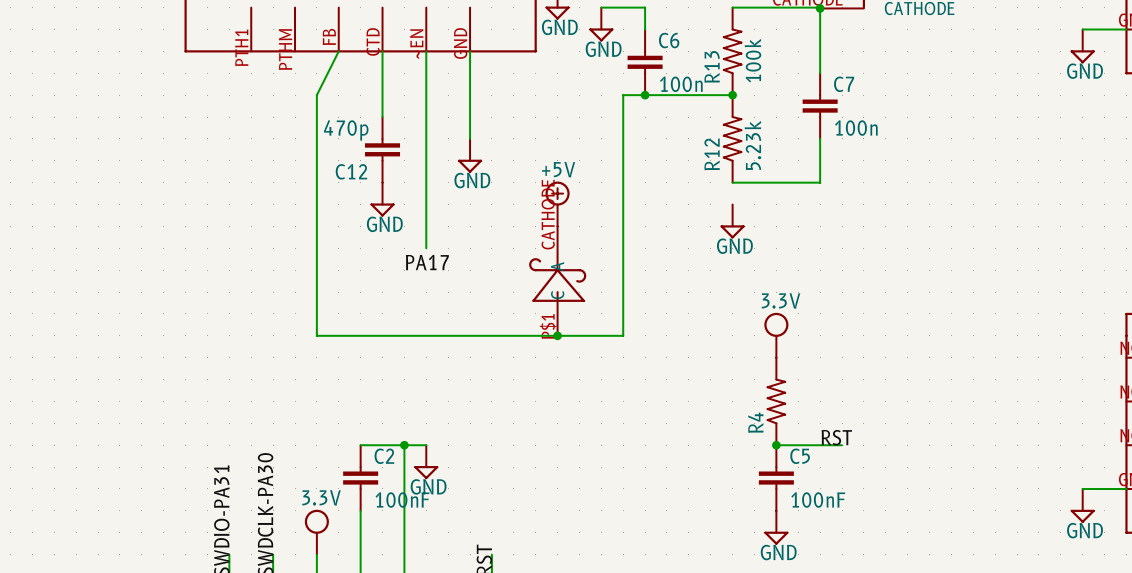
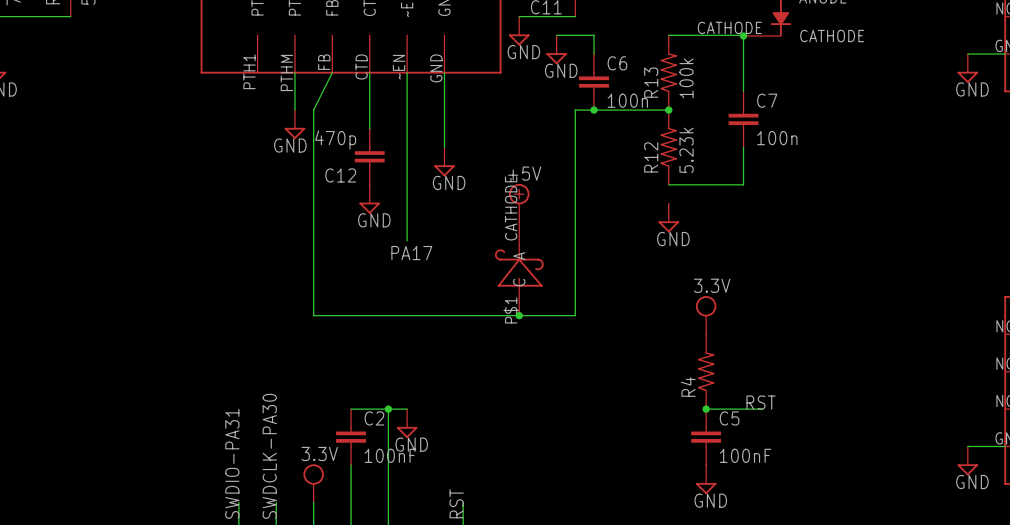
wire: none -> (294, 72) (294, 110)
power symbol: none -> GND (294, 124)

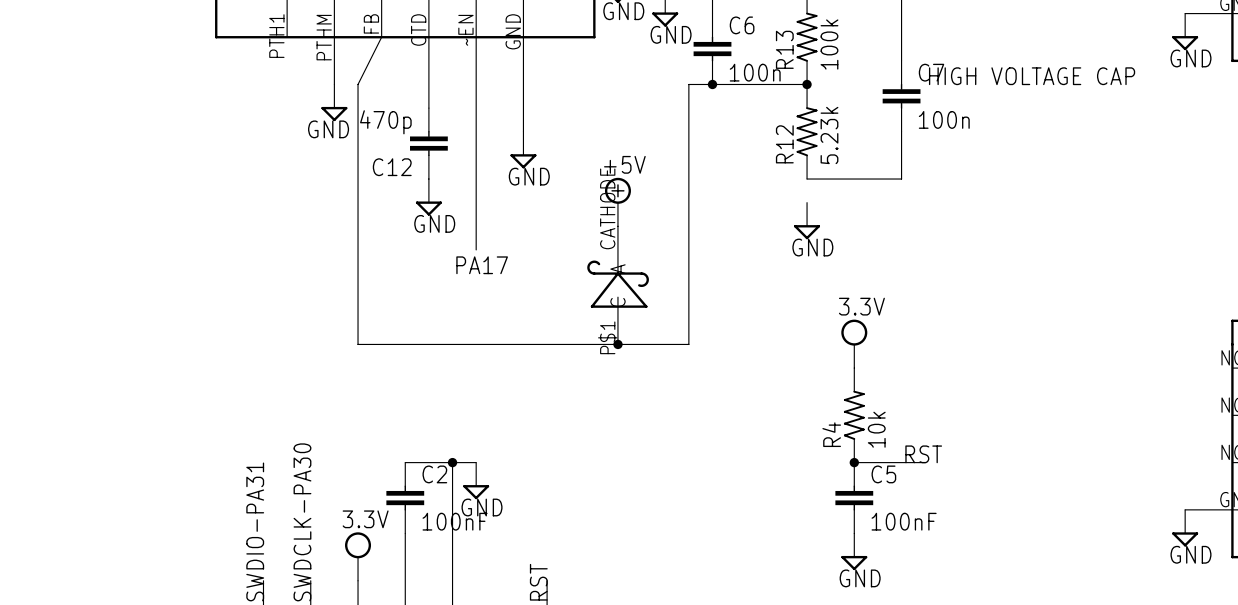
text: none -> HIGH VOLTAGE CAP (1032, 76)
R4 value: none -> 10k (876, 429)

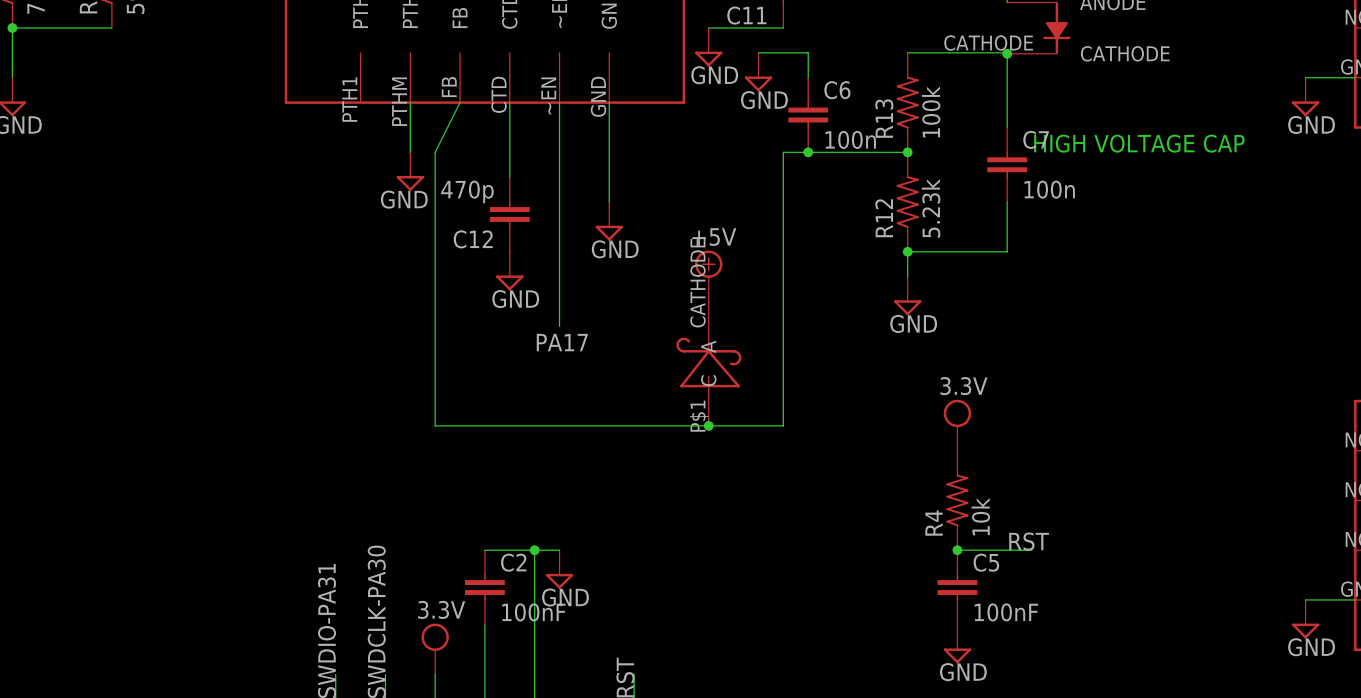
wire: none -> (907, 251) (907, 276)
junction: none -> (907, 251)

